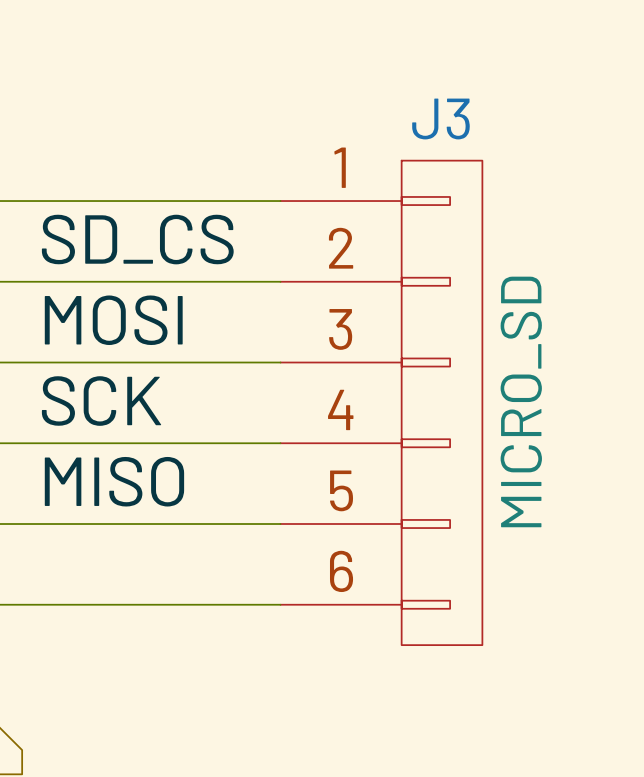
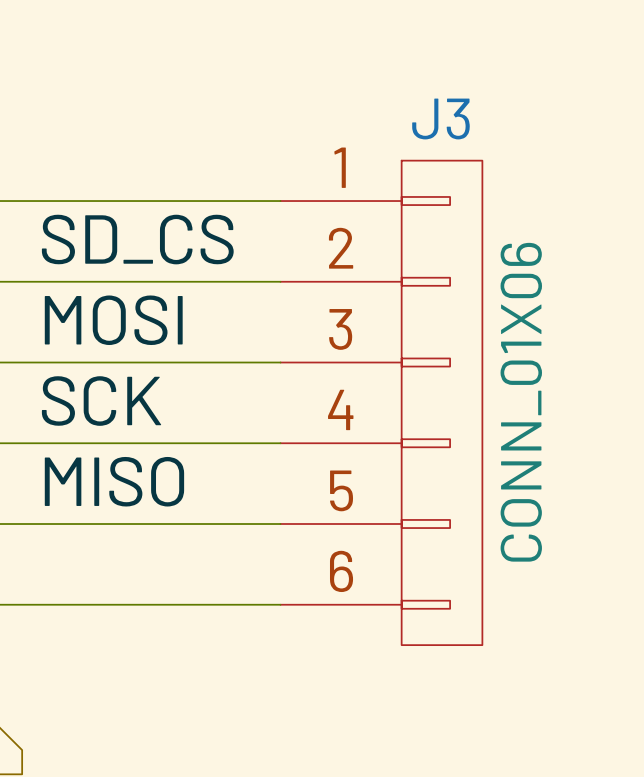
J3 value: MICRO_SD (521, 401) -> CONN_01X06 (521, 402)

